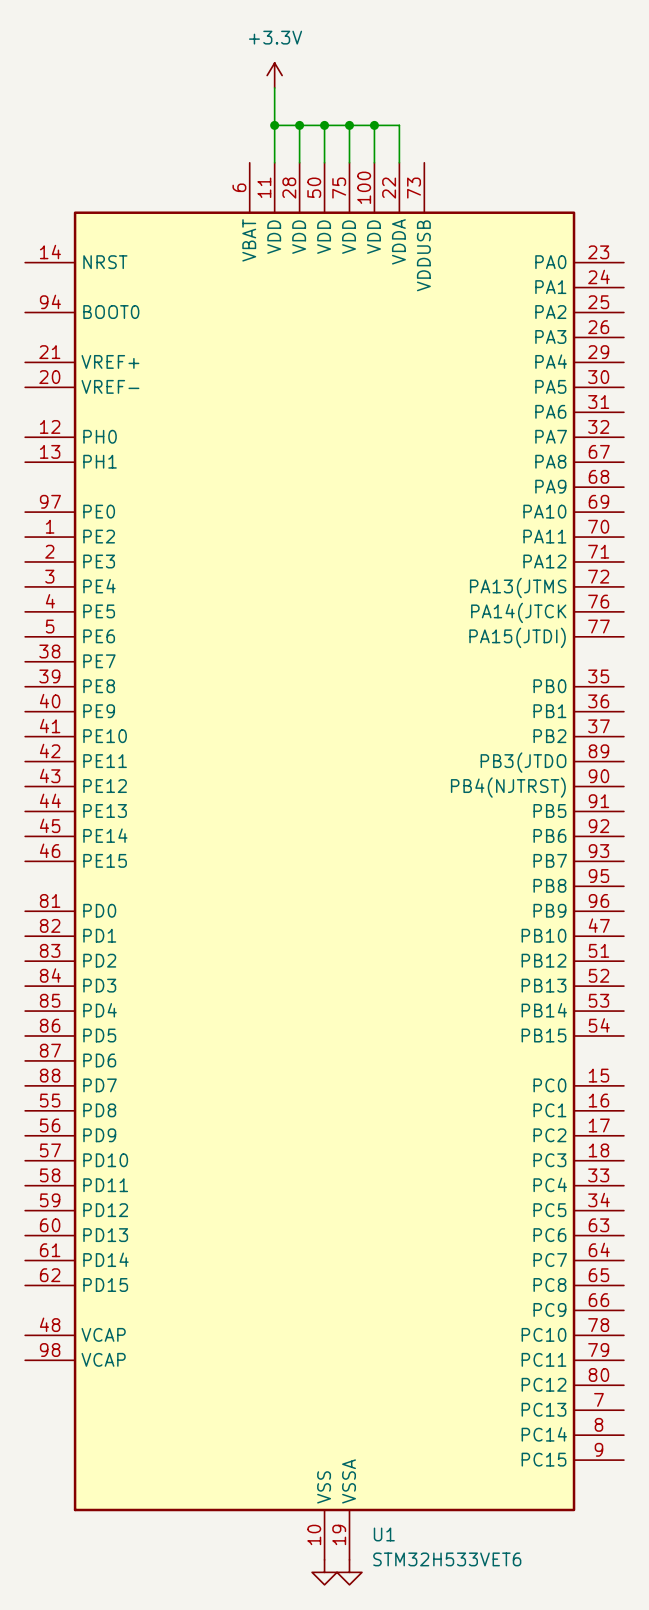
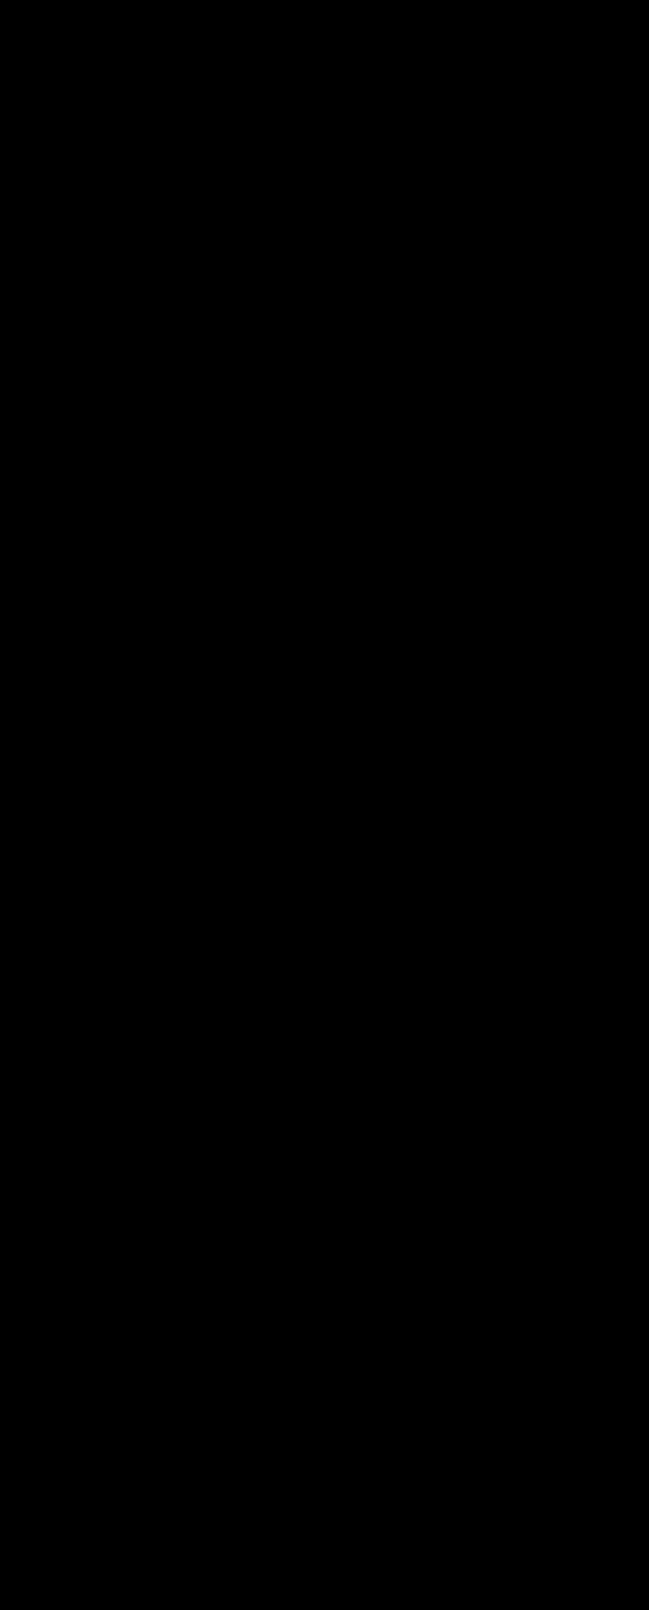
power symbol: +3.3V (274, 75) -> none
wire: (274, 87) (274, 162) -> none
wire: (274, 125) (399, 125) (399, 162) -> none
junction: (274, 125) -> none
wire: (299, 125) (299, 162) -> none
junction: (299, 125) -> none
wire: (324, 125) (324, 162) -> none
junction: (324, 125) -> none
wire: (349, 125) (349, 162) -> none
junction: (349, 125) -> none
wire: (374, 125) (374, 162) -> none
junction: (374, 125) -> none
U1: STM32H533VET6 (324, 861) -> none
power symbol: (324, 1572) -> none
power symbol: (349, 1572) -> none

